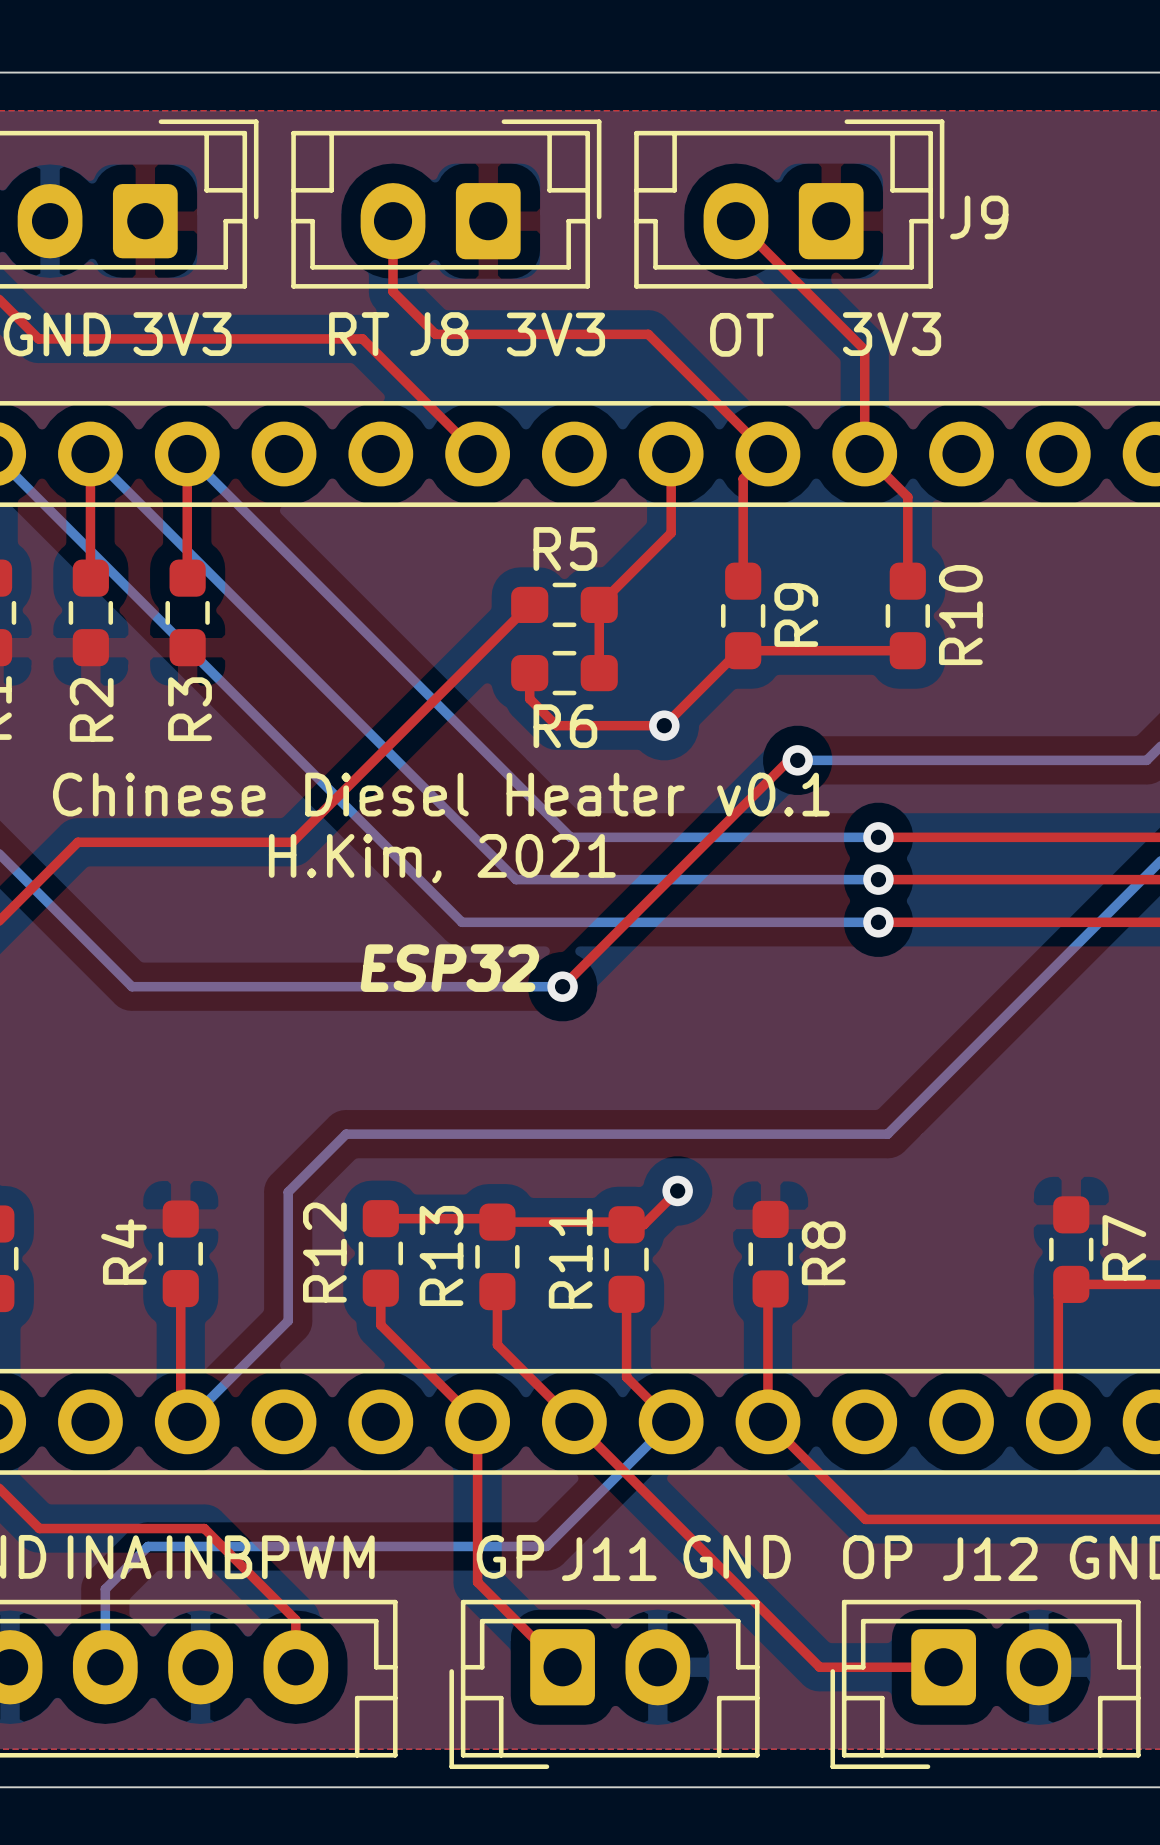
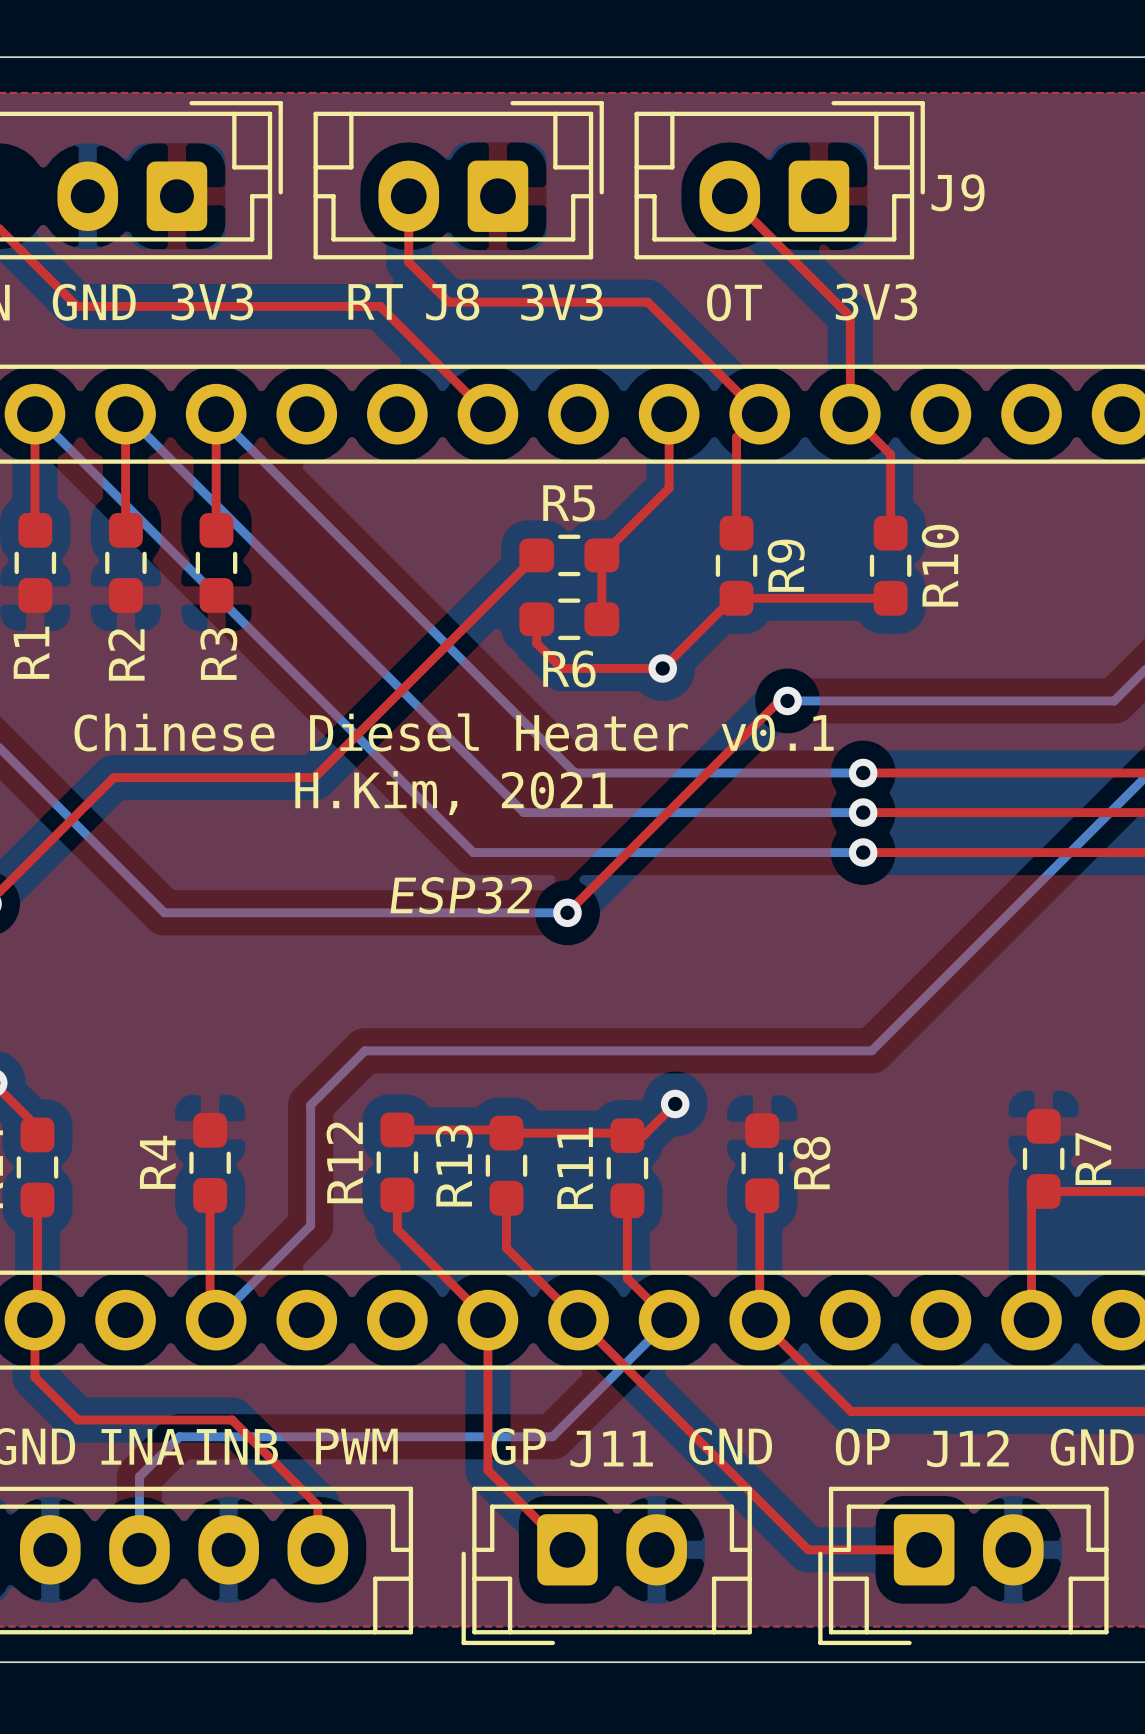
text position: PWM (318, 1557) -> PWM (356, 1446)

